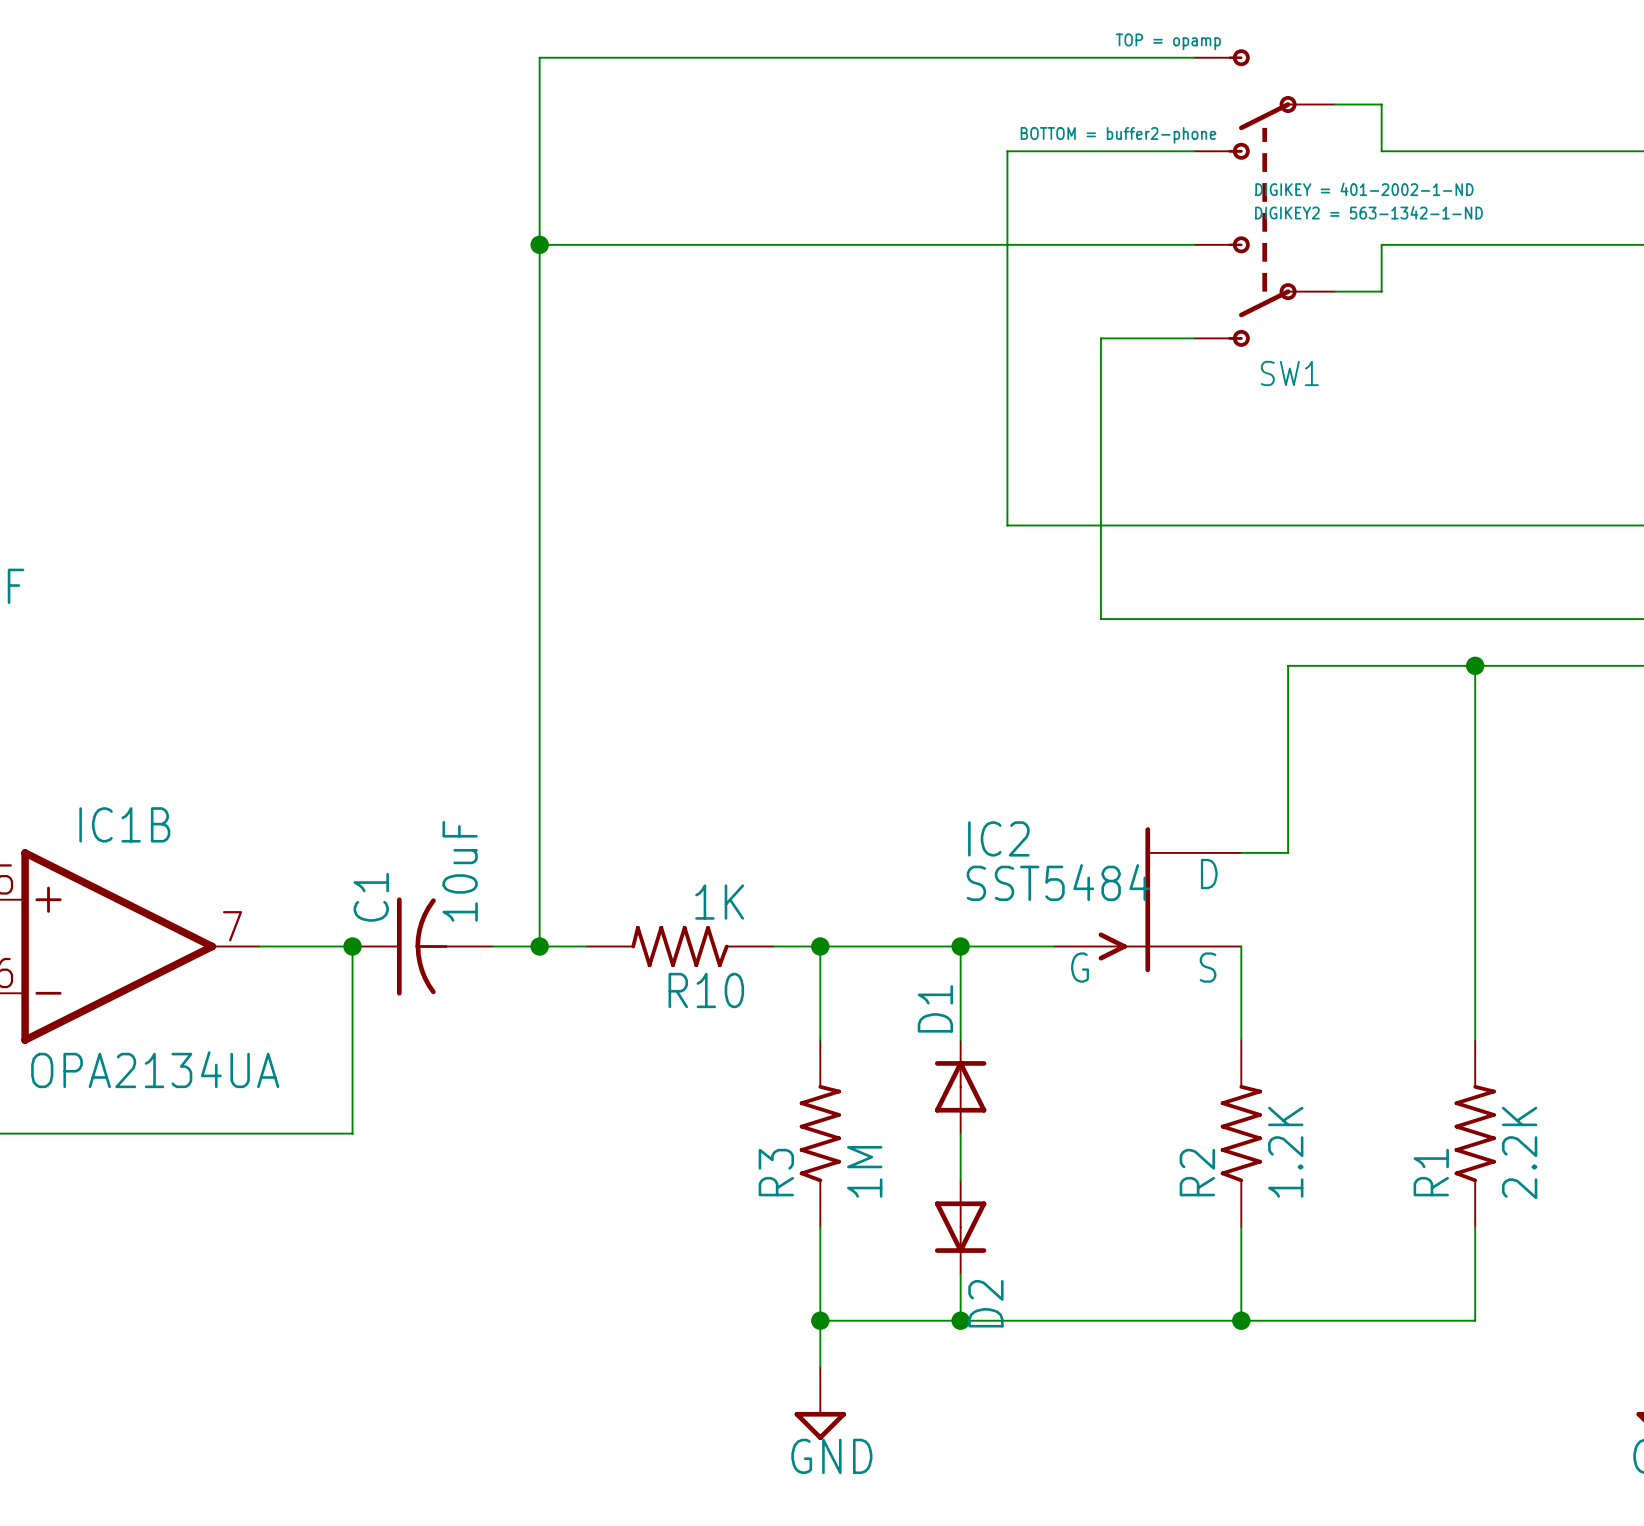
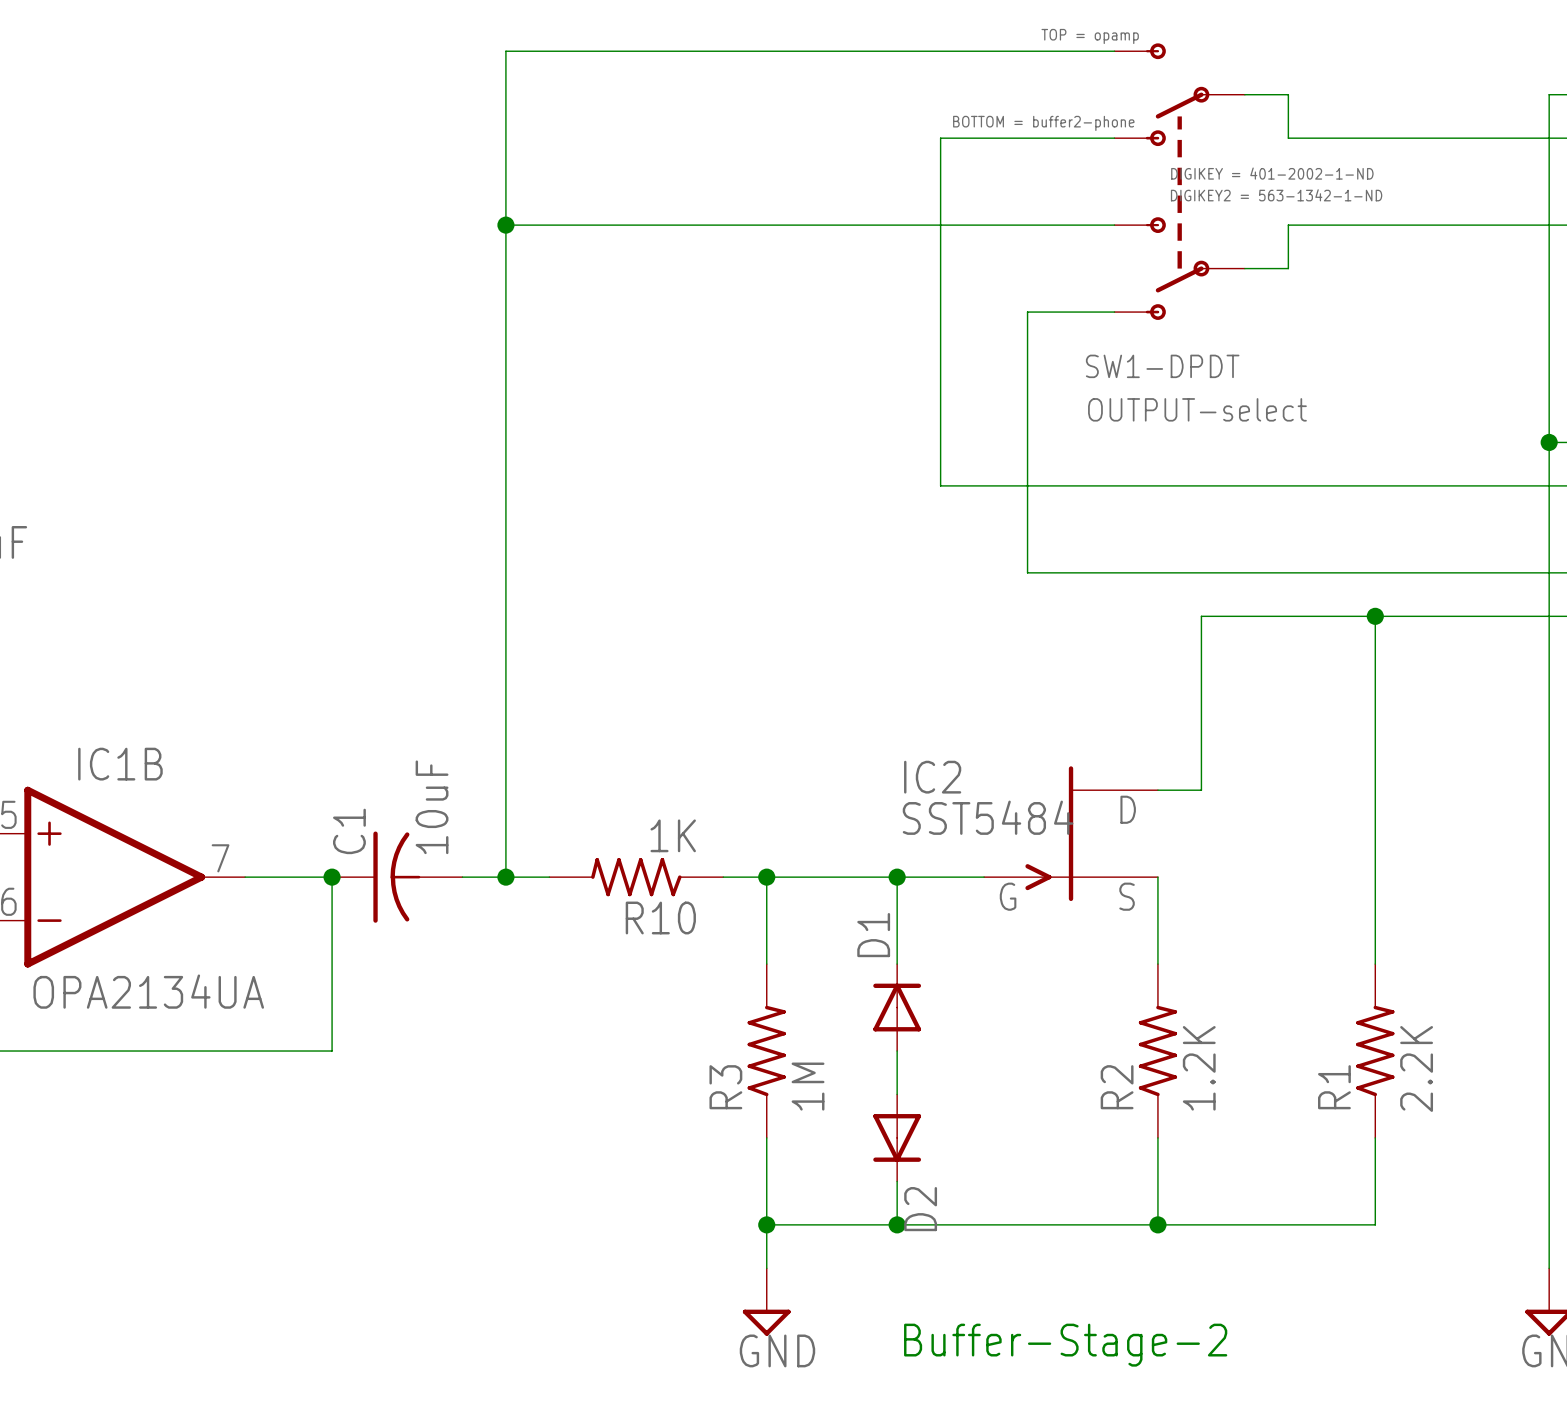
SW1 name: SW1 (1289, 373) -> SW1-DPDT (1162, 366)
SW1 value: none -> OUTPUT-select (1197, 409)
text: none -> Buffer-Stage-2 (1065, 1345)

